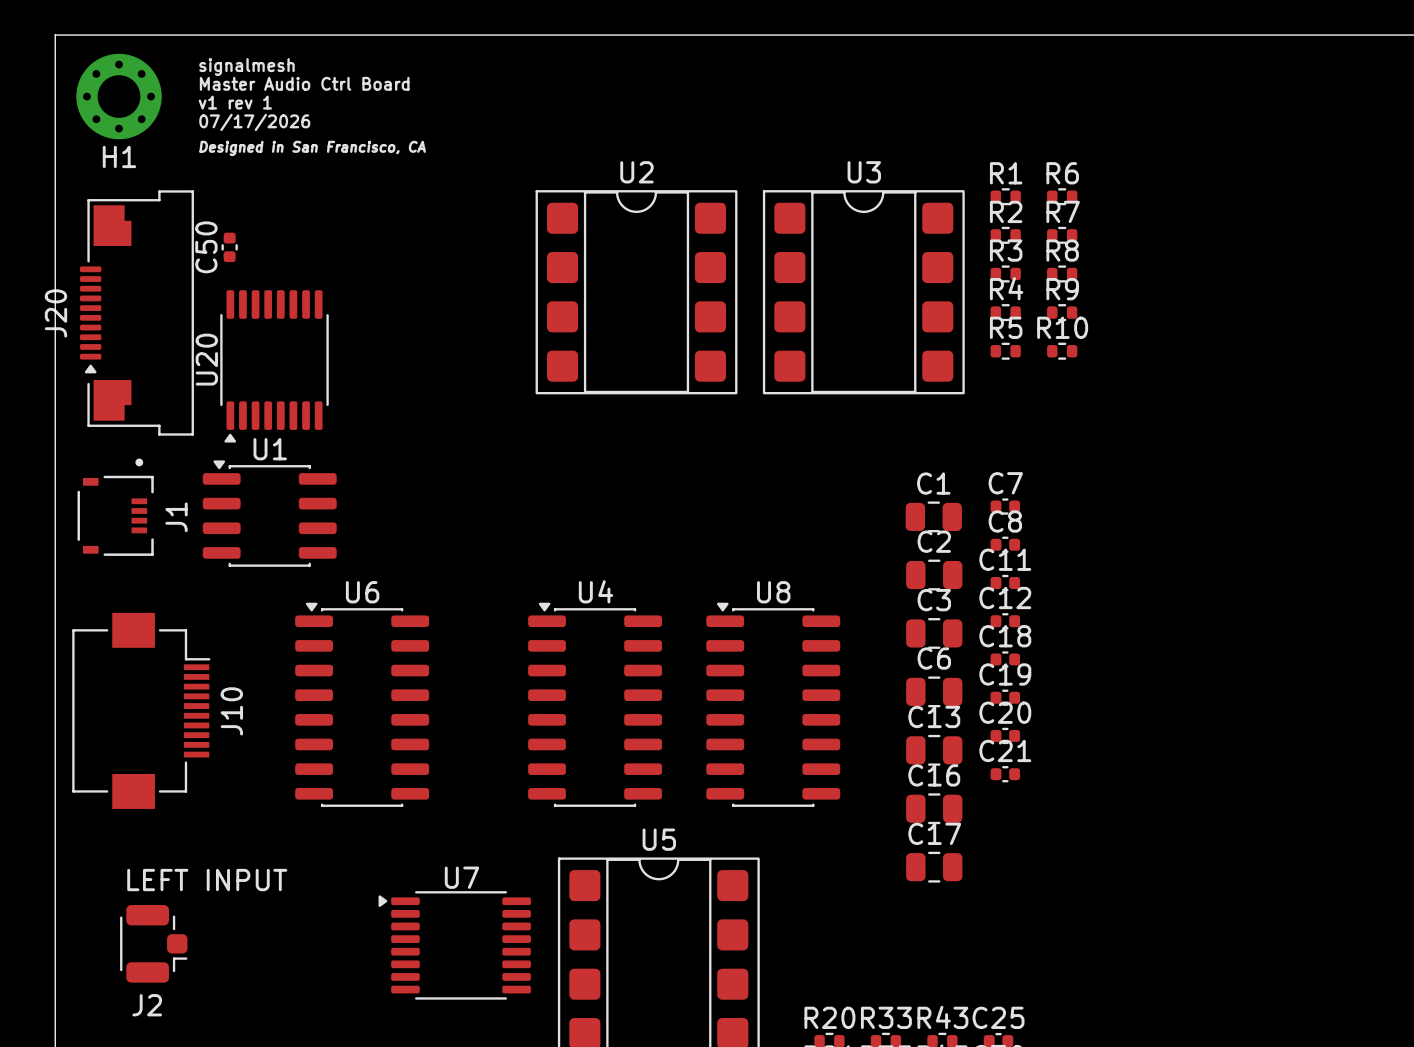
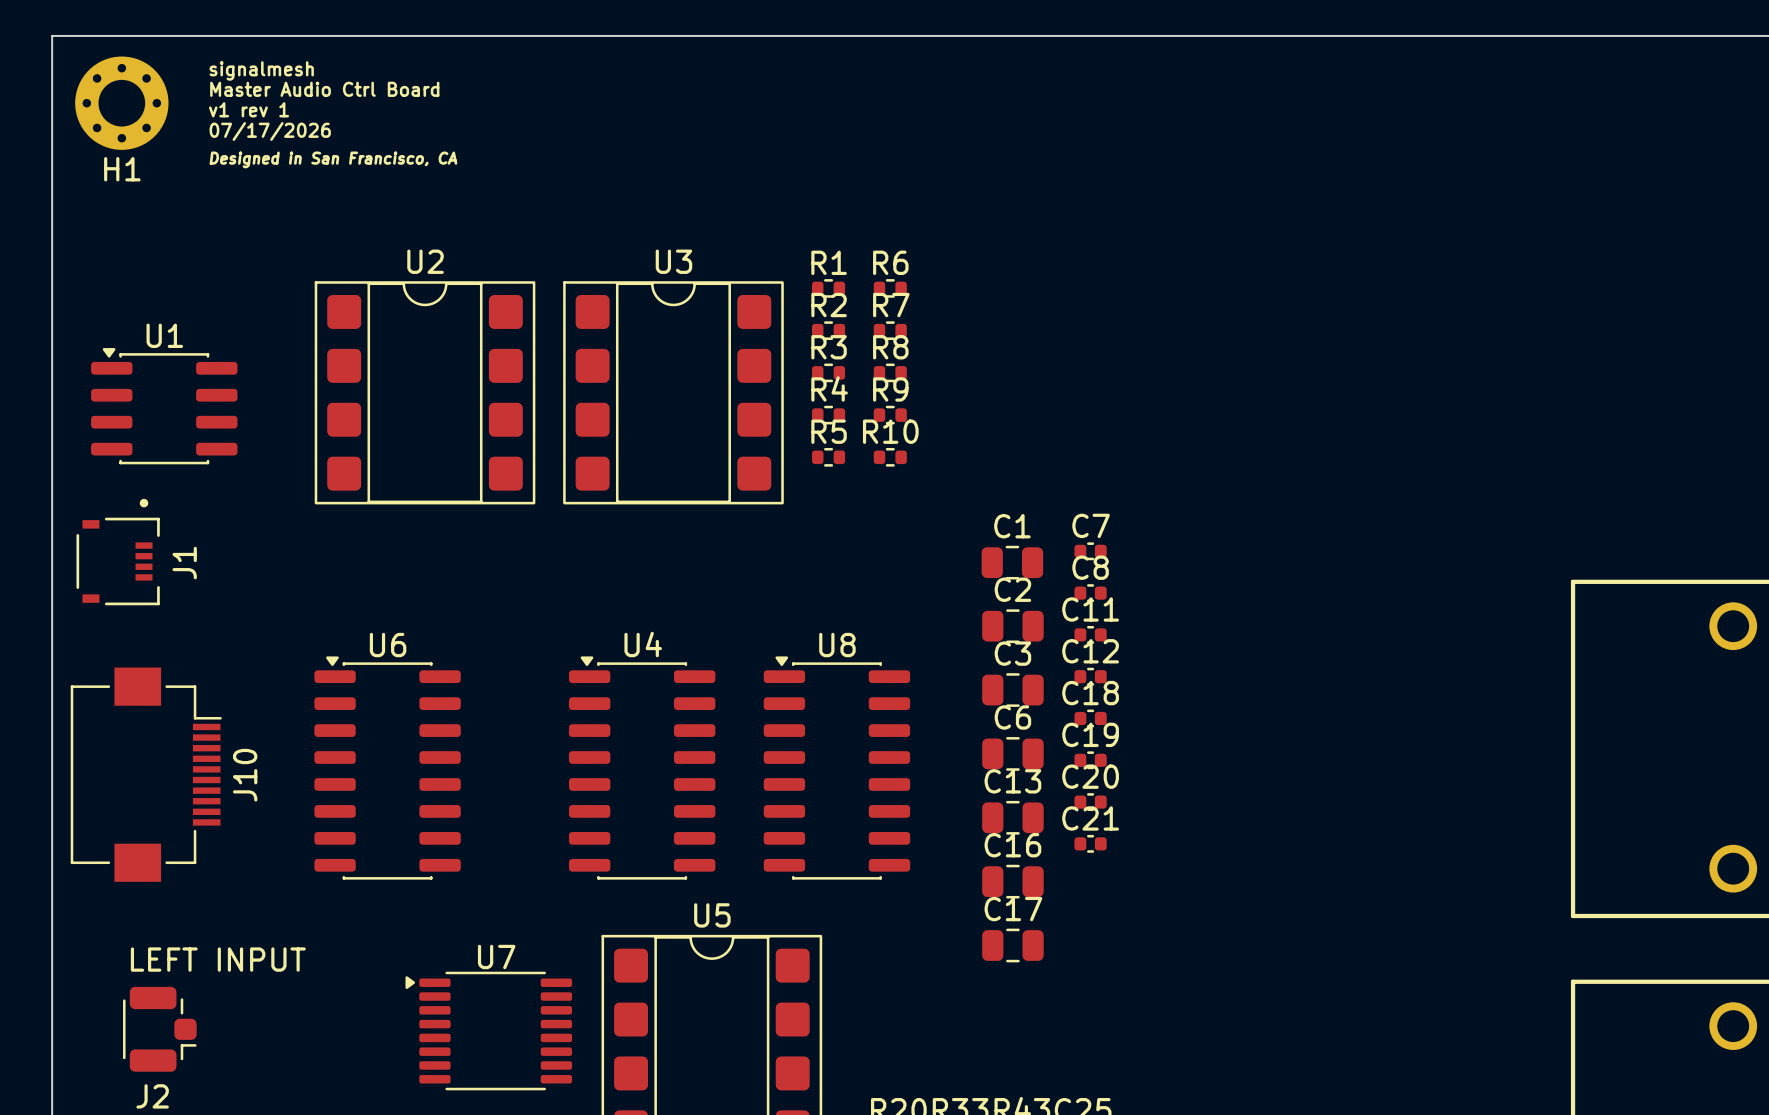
R1 position: (1005, 196) -> (828, 288)
R6 position: (1062, 196) -> (890, 288)
R2 position: (1005, 235) -> (828, 330)
R7 position: (1062, 235) -> (890, 330)
C50: (229, 247) -> none
R3 position: (1005, 273) -> (828, 372)
R8 position: (1062, 273) -> (890, 372)
U2 position: (636, 292) -> (425, 392)
U3 position: (863, 292) -> (673, 392)
J20: (136, 312) -> none
R4 position: (1005, 312) -> (828, 415)
R9 position: (1062, 312) -> (890, 415)
R5 position: (1005, 351) -> (828, 457)
R10 position: (1062, 351) -> (890, 457)
U20: (274, 366) -> none
U1 position: (269, 513) -> (164, 406)

